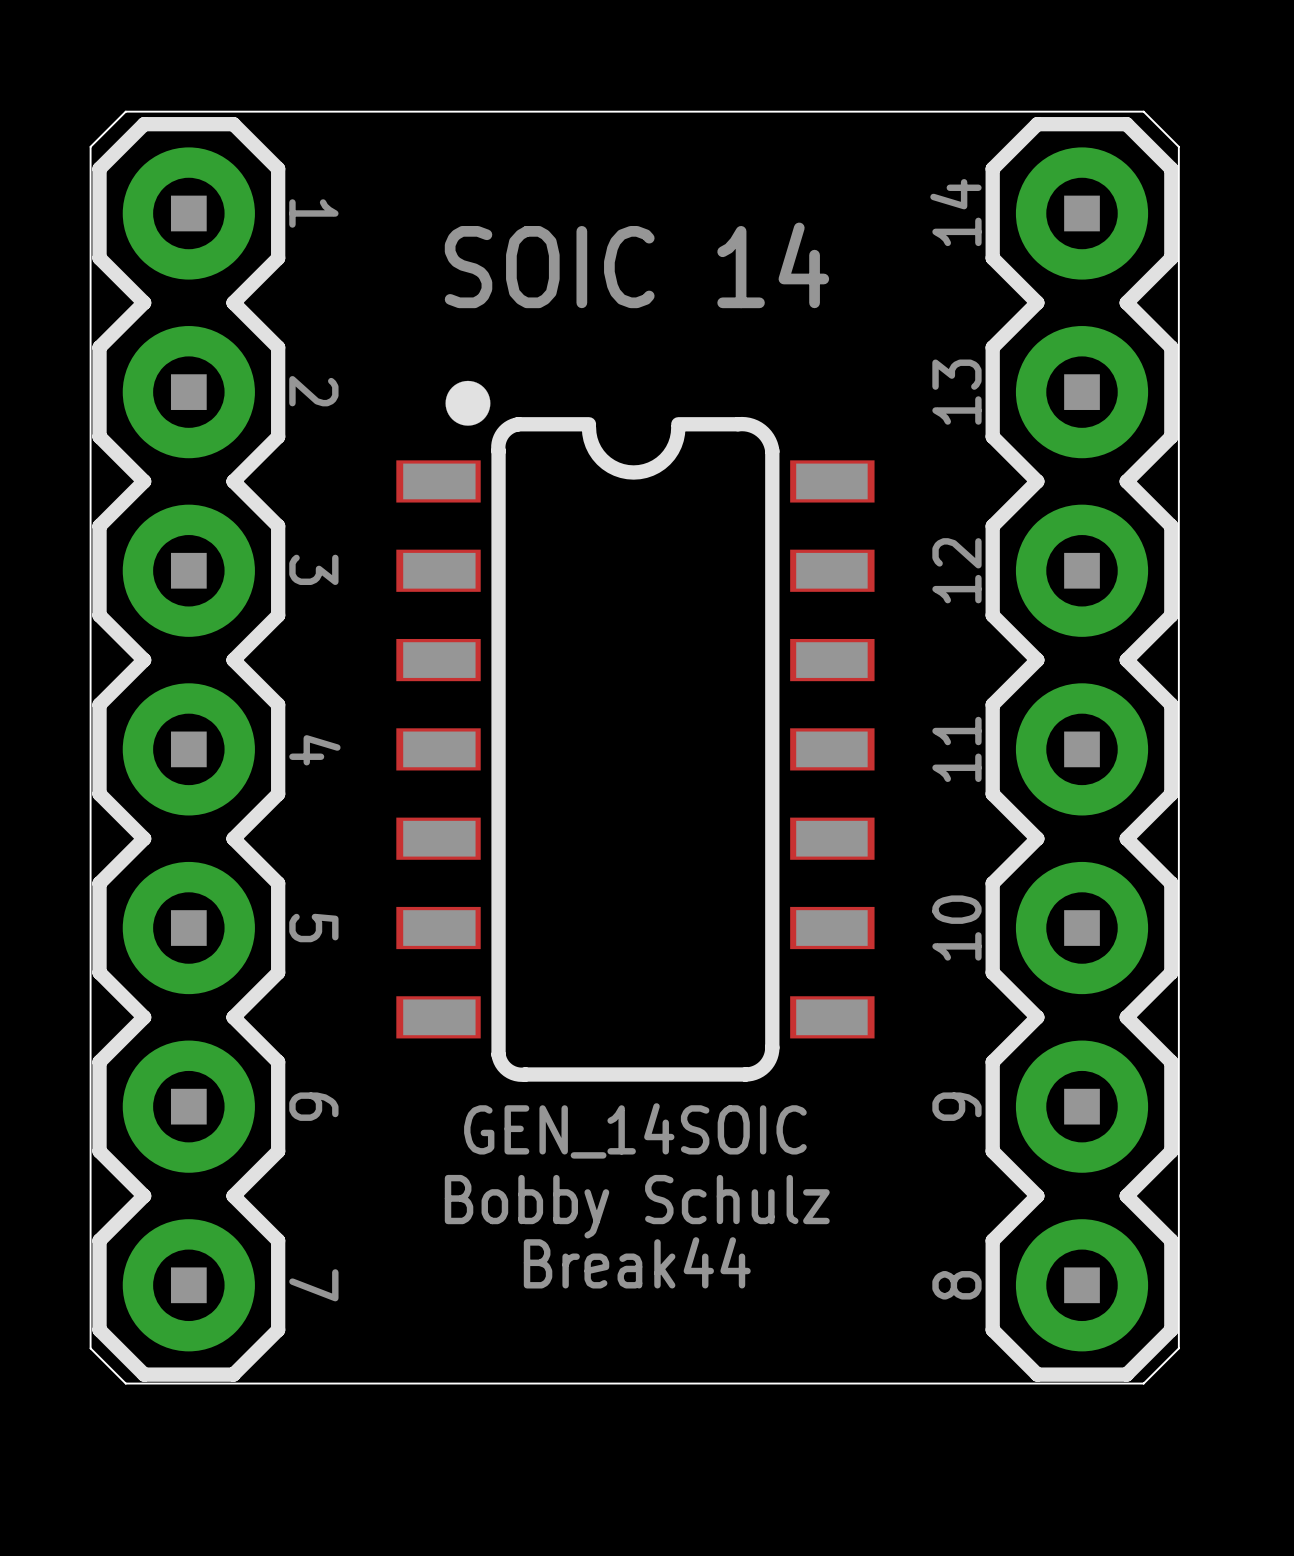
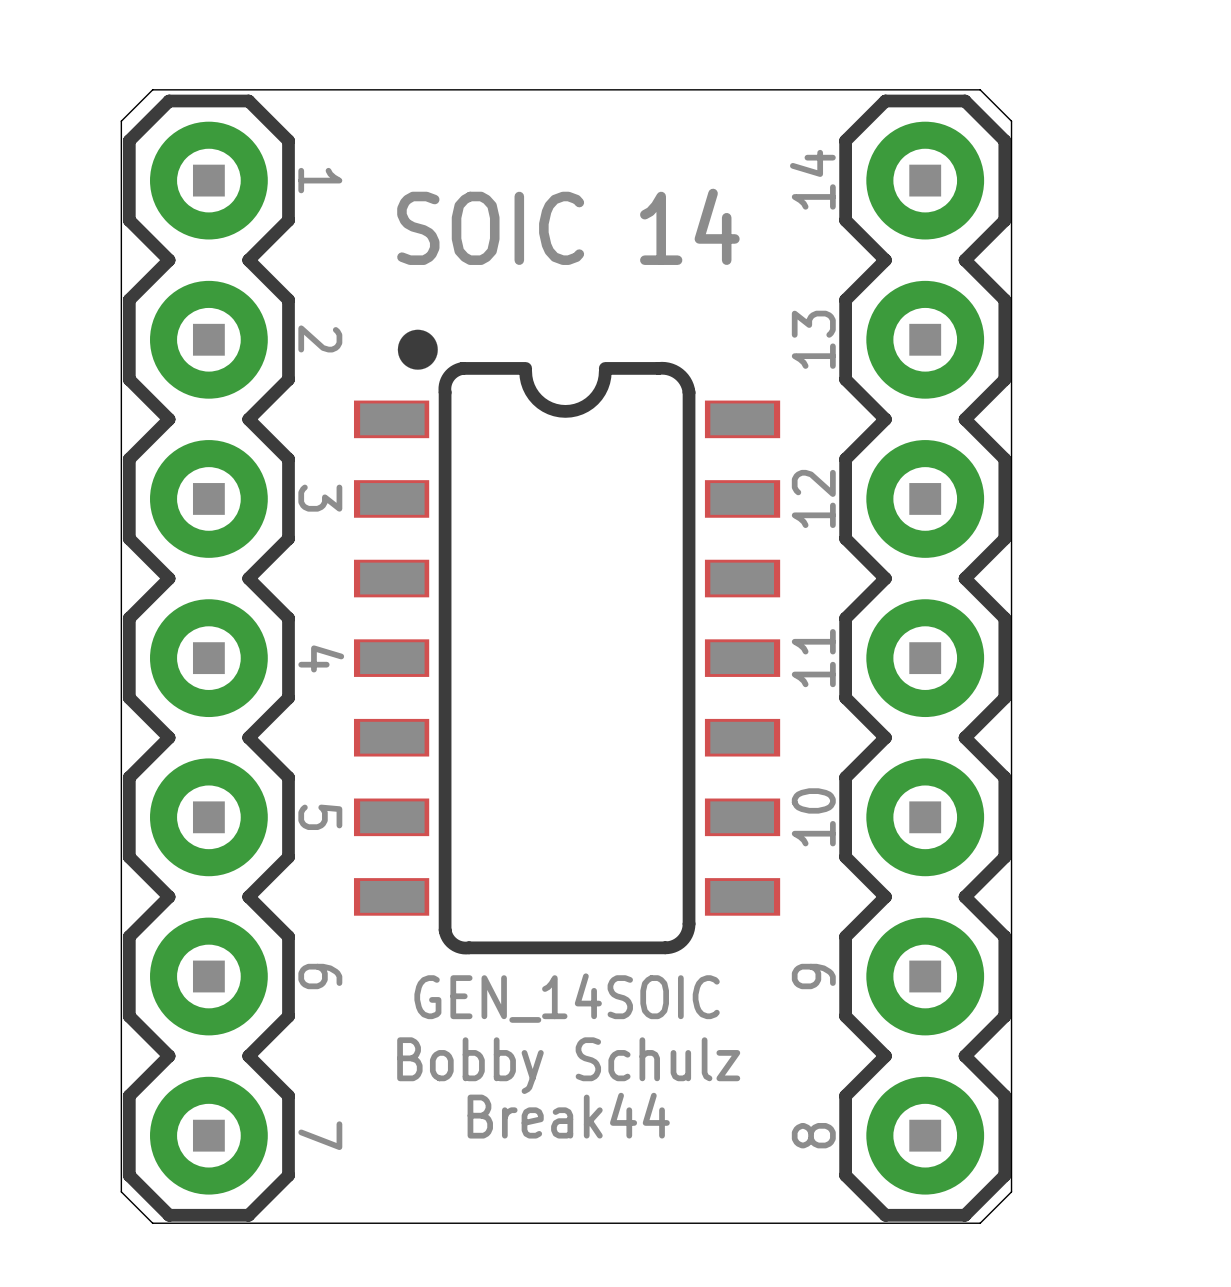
board edge: (1054, 111) (1143, 111) (1178, 146) (1178, 1348) (1143, 1383) (1054, 1383) -> (980, 89) (1011, 121) (1011, 1191) (980, 1223)
text position: 14 (955, 212) -> 14 (812, 179)
text position: SOIC 14 (636, 265) -> SOIC 14 (568, 226)
text position: 13 (956, 392) -> 13 (813, 339)
text position: 12 (956, 570) -> 12 (813, 498)
part position: (635, 731) -> (567, 642)
text position: 11 (956, 749) -> 11 (813, 658)
part position: (1082, 749) -> (925, 658)
text position: 10 (956, 928) -> 10 (813, 817)
text position: 9 (956, 1106) -> 9 (813, 976)
text position: Bobby Schulz (637, 1206) -> Bobby Schulz (568, 1065)
text position: Break44 (637, 1262) -> Break44 (568, 1115)
text position: 8 (956, 1285) -> 8 (813, 1135)

